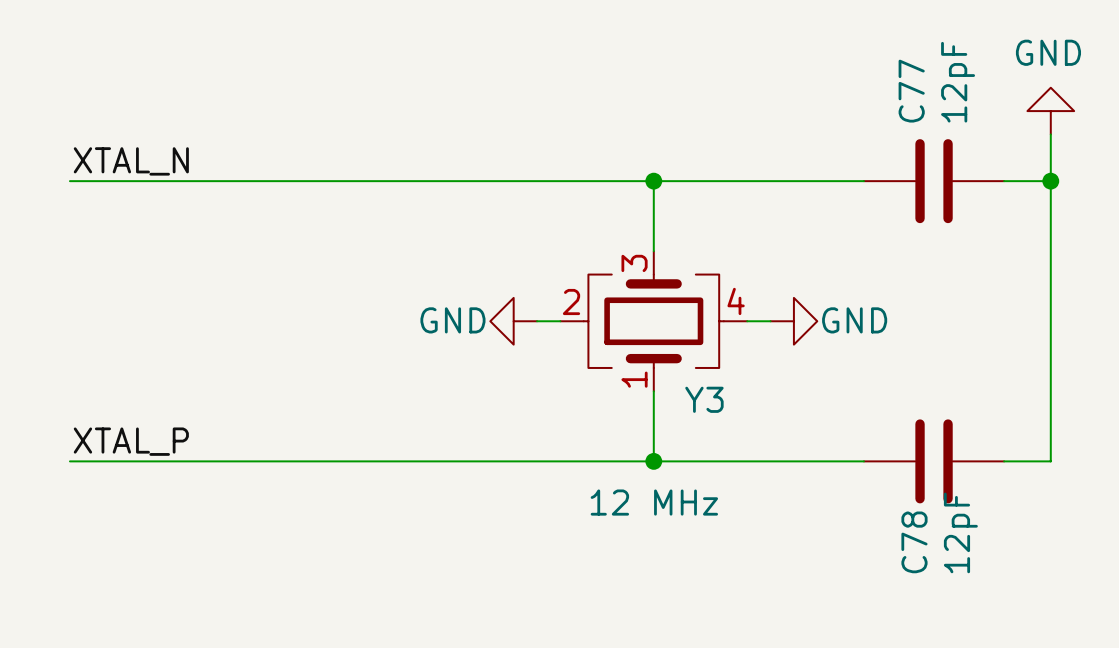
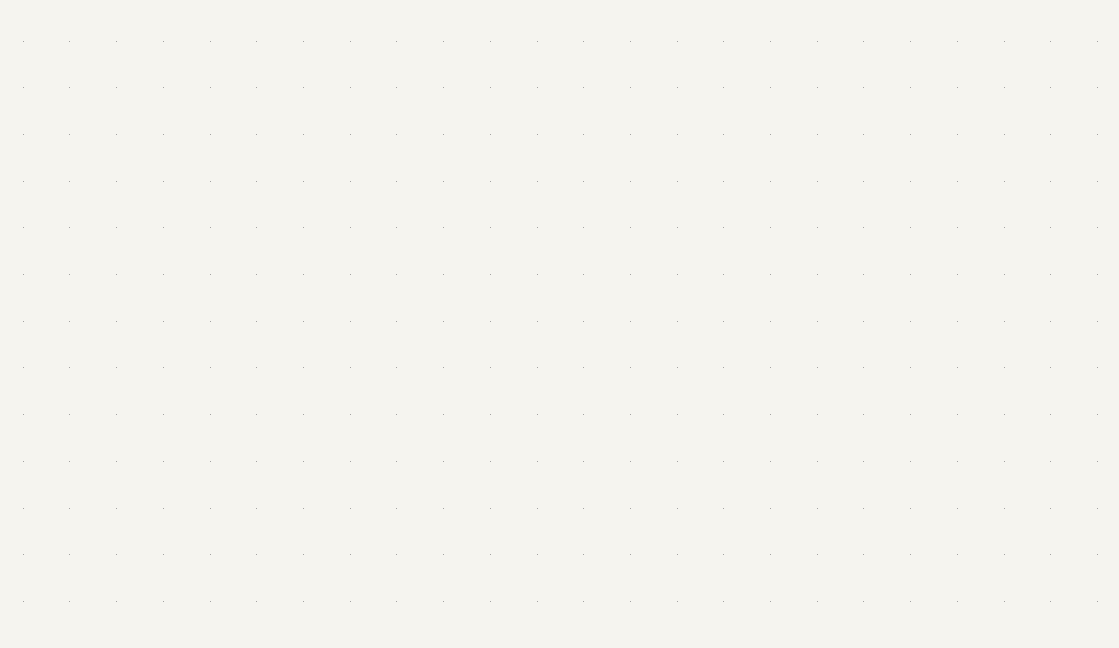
power symbol: GND (1050, 111) -> none
wire: (1050, 134) (1050, 461) (1004, 461) -> none
label: XTAL_N (131, 161) -> none
wire: (69, 181) (863, 181) -> none
wire: (653, 181) (653, 251) -> none
junction: (653, 181) -> none
C77: 12pF (934, 181) -> none
wire: (1004, 181) (1050, 181) -> none
junction: (1050, 181) -> none
power symbol: GND (513, 321) -> none
wire: (537, 321) (560, 321) -> none
Y3: 12 MHz (653, 321) -> none
wire: (747, 321) (770, 321) -> none
power symbol: GND (793, 321) -> none
wire: (653, 391) (653, 461) -> none
label: XTAL_P (131, 441) -> none
wire: (69, 461) (863, 461) -> none
junction: (653, 461) -> none
C78: 12pF (934, 461) -> none

